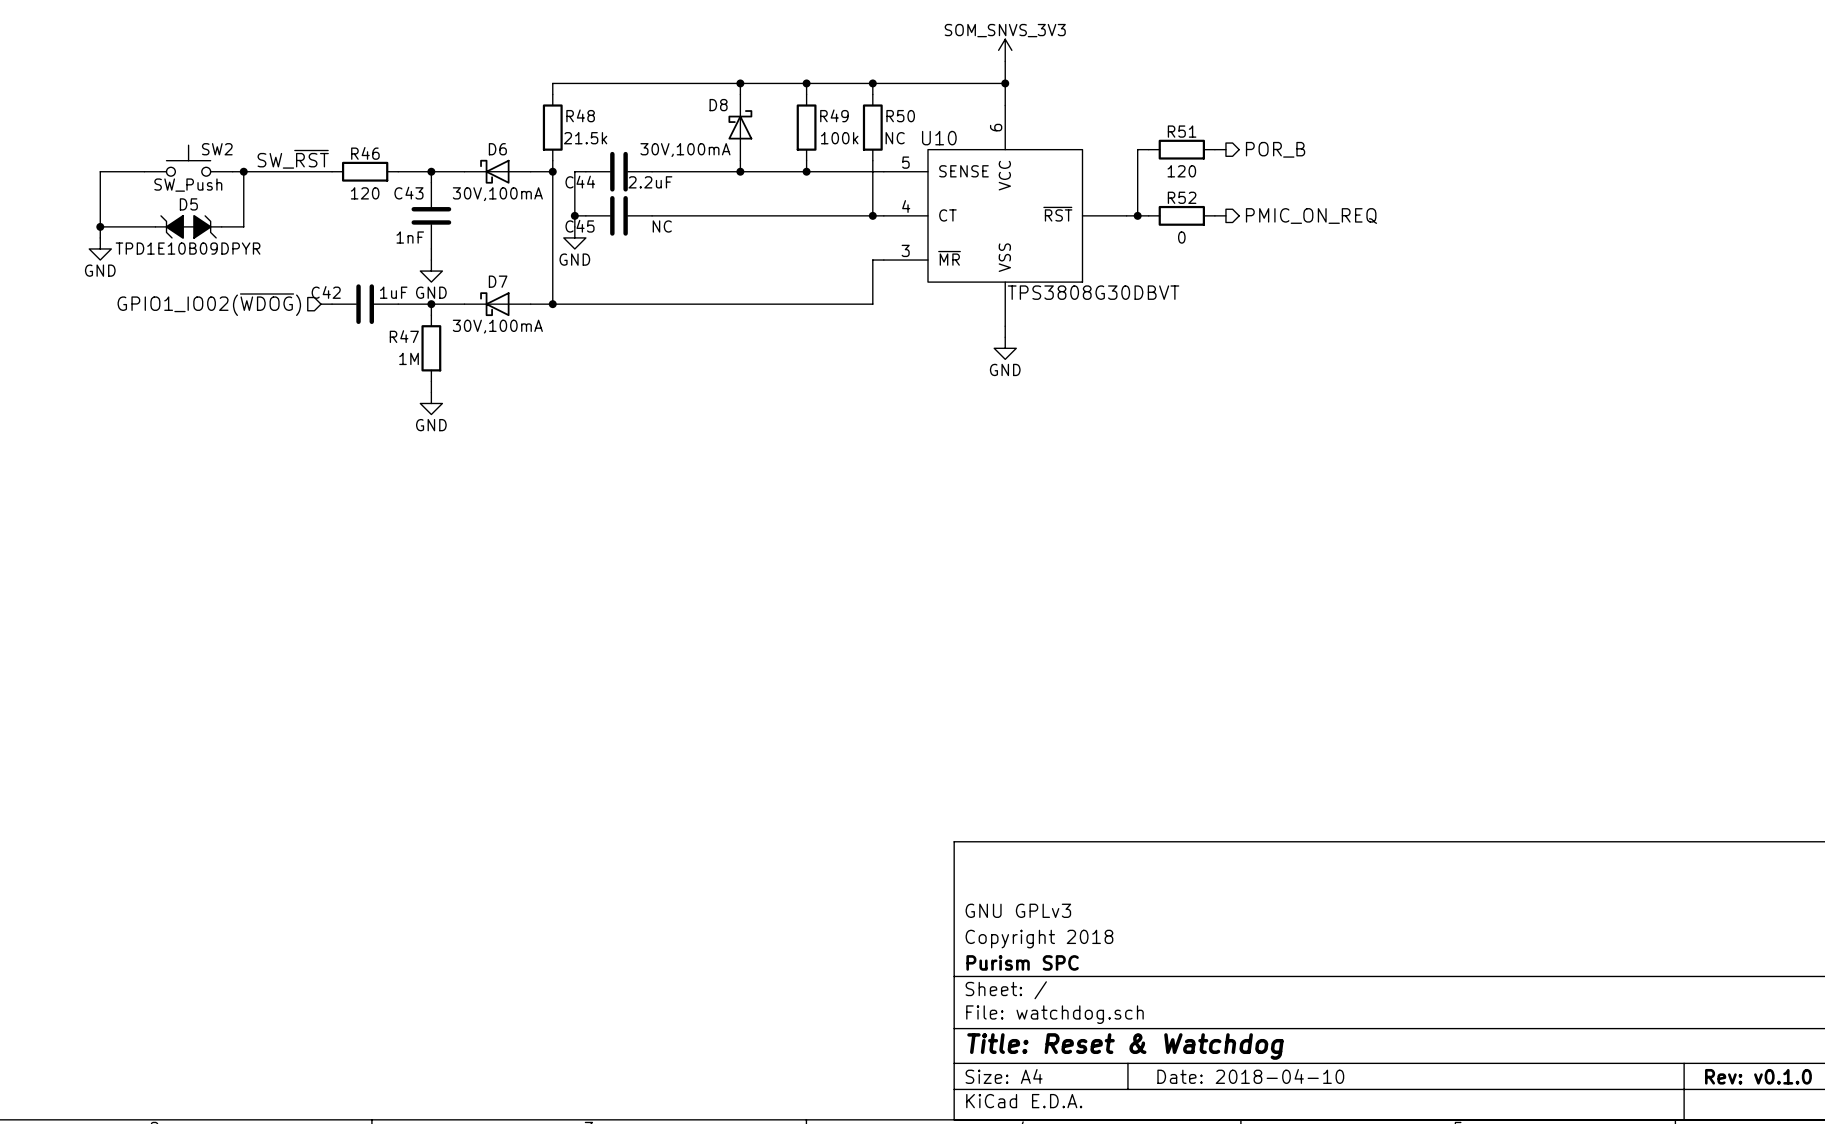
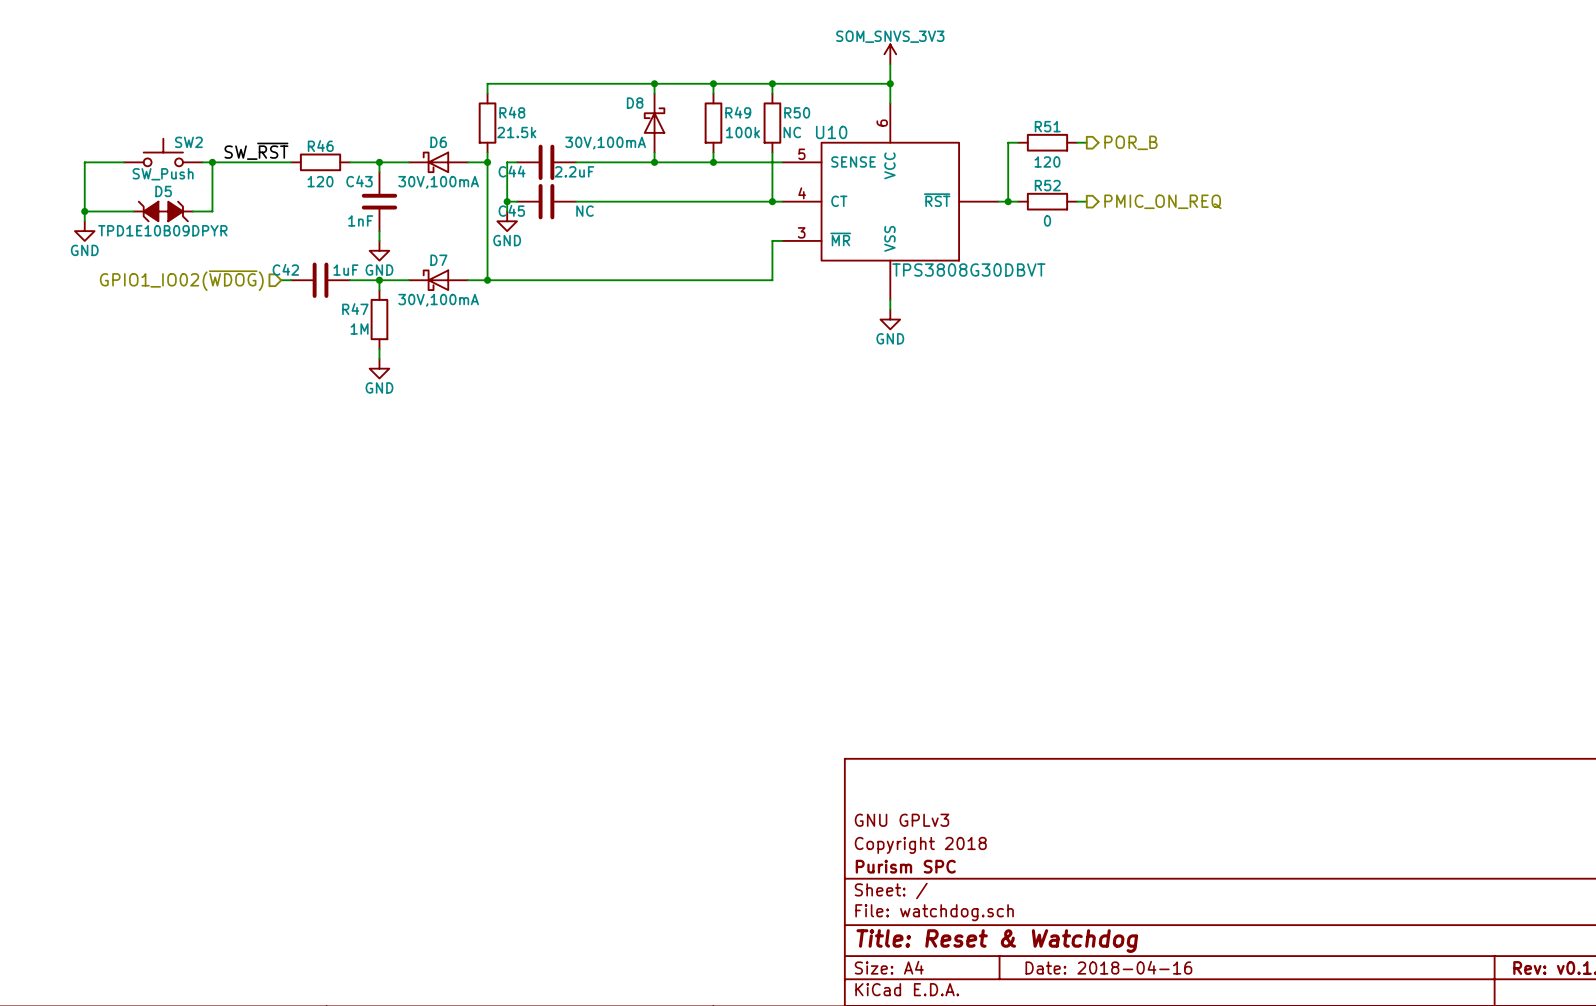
title block: Date: 2018-04-10 (1250, 1076) -> Date: 2018-04-16 (1108, 967)

